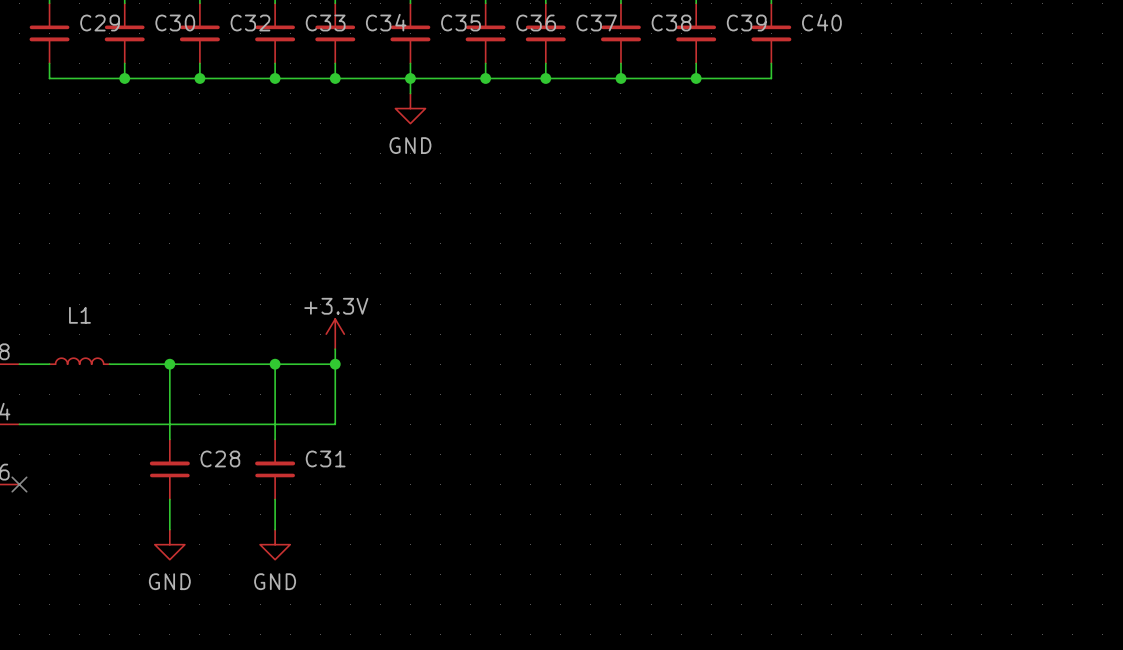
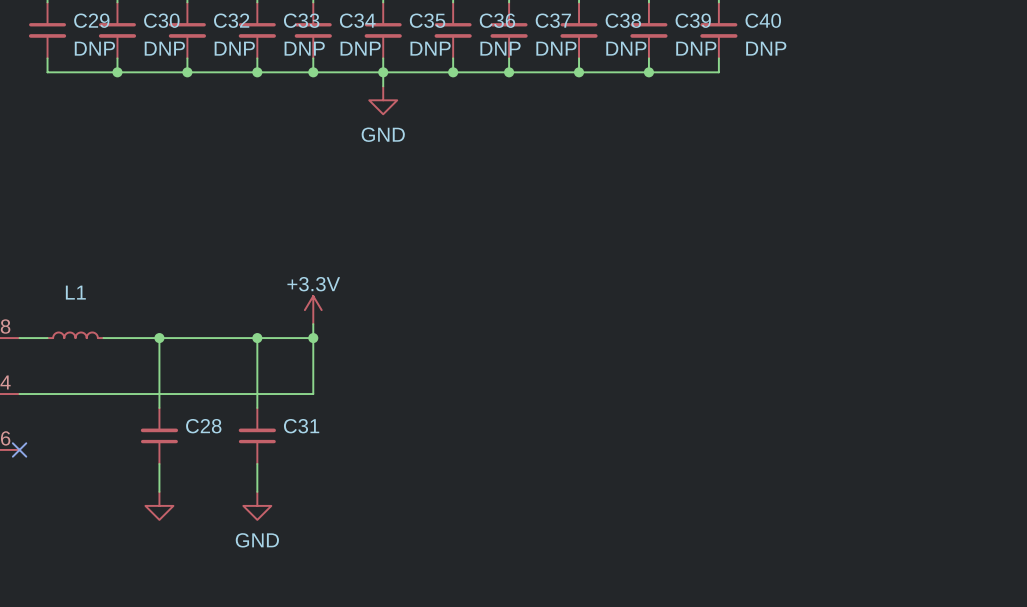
C29 value: none -> DNP (94, 48)
C30 value: none -> DNP (164, 48)
C32 value: none -> DNP (234, 48)
C33 value: none -> DNP (304, 48)
C34 value: none -> DNP (360, 48)
C35 value: none -> DNP (430, 48)
C36 value: none -> DNP (500, 48)
C37 value: none -> DNP (556, 48)
C38 value: none -> DNP (626, 48)
C39 value: none -> DNP (696, 48)
C40 value: none -> DNP (766, 48)
power symbol text: GND (169, 581) -> none

